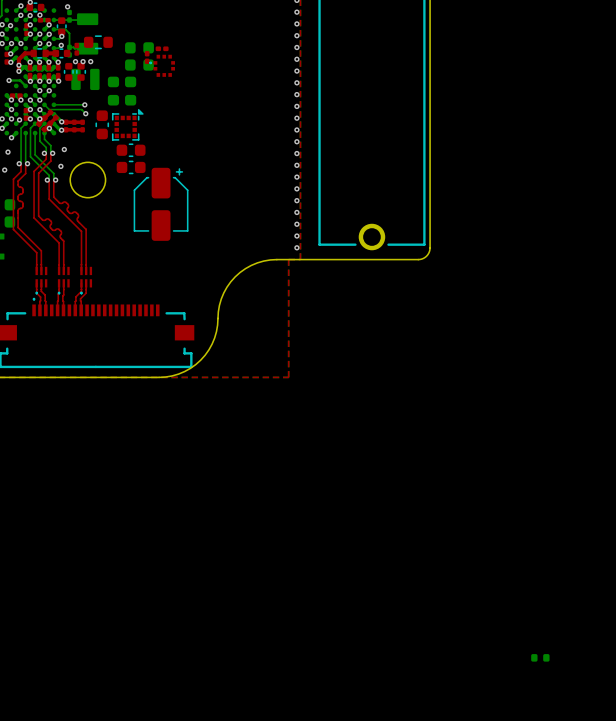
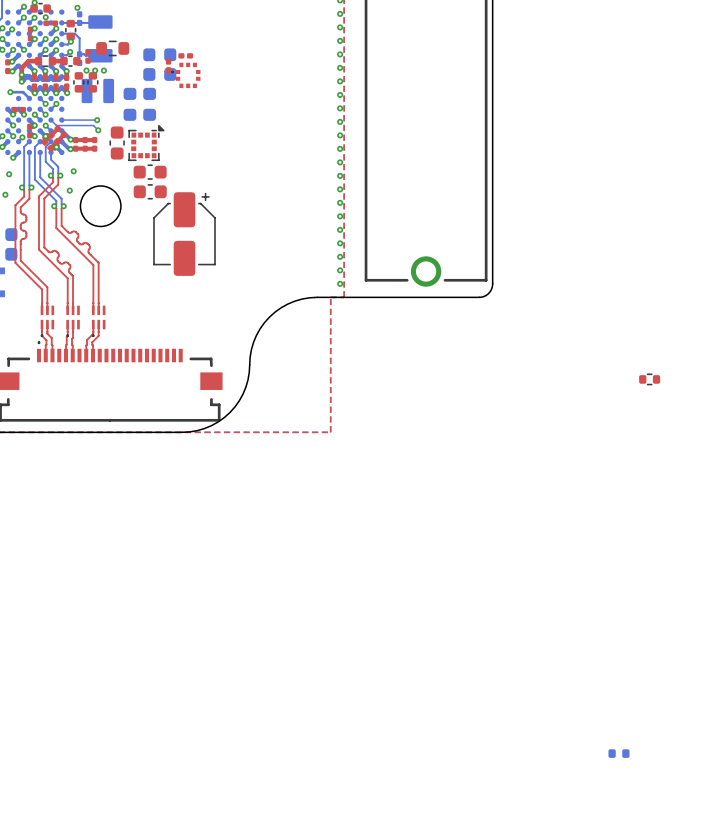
part: none -> (649, 379)

